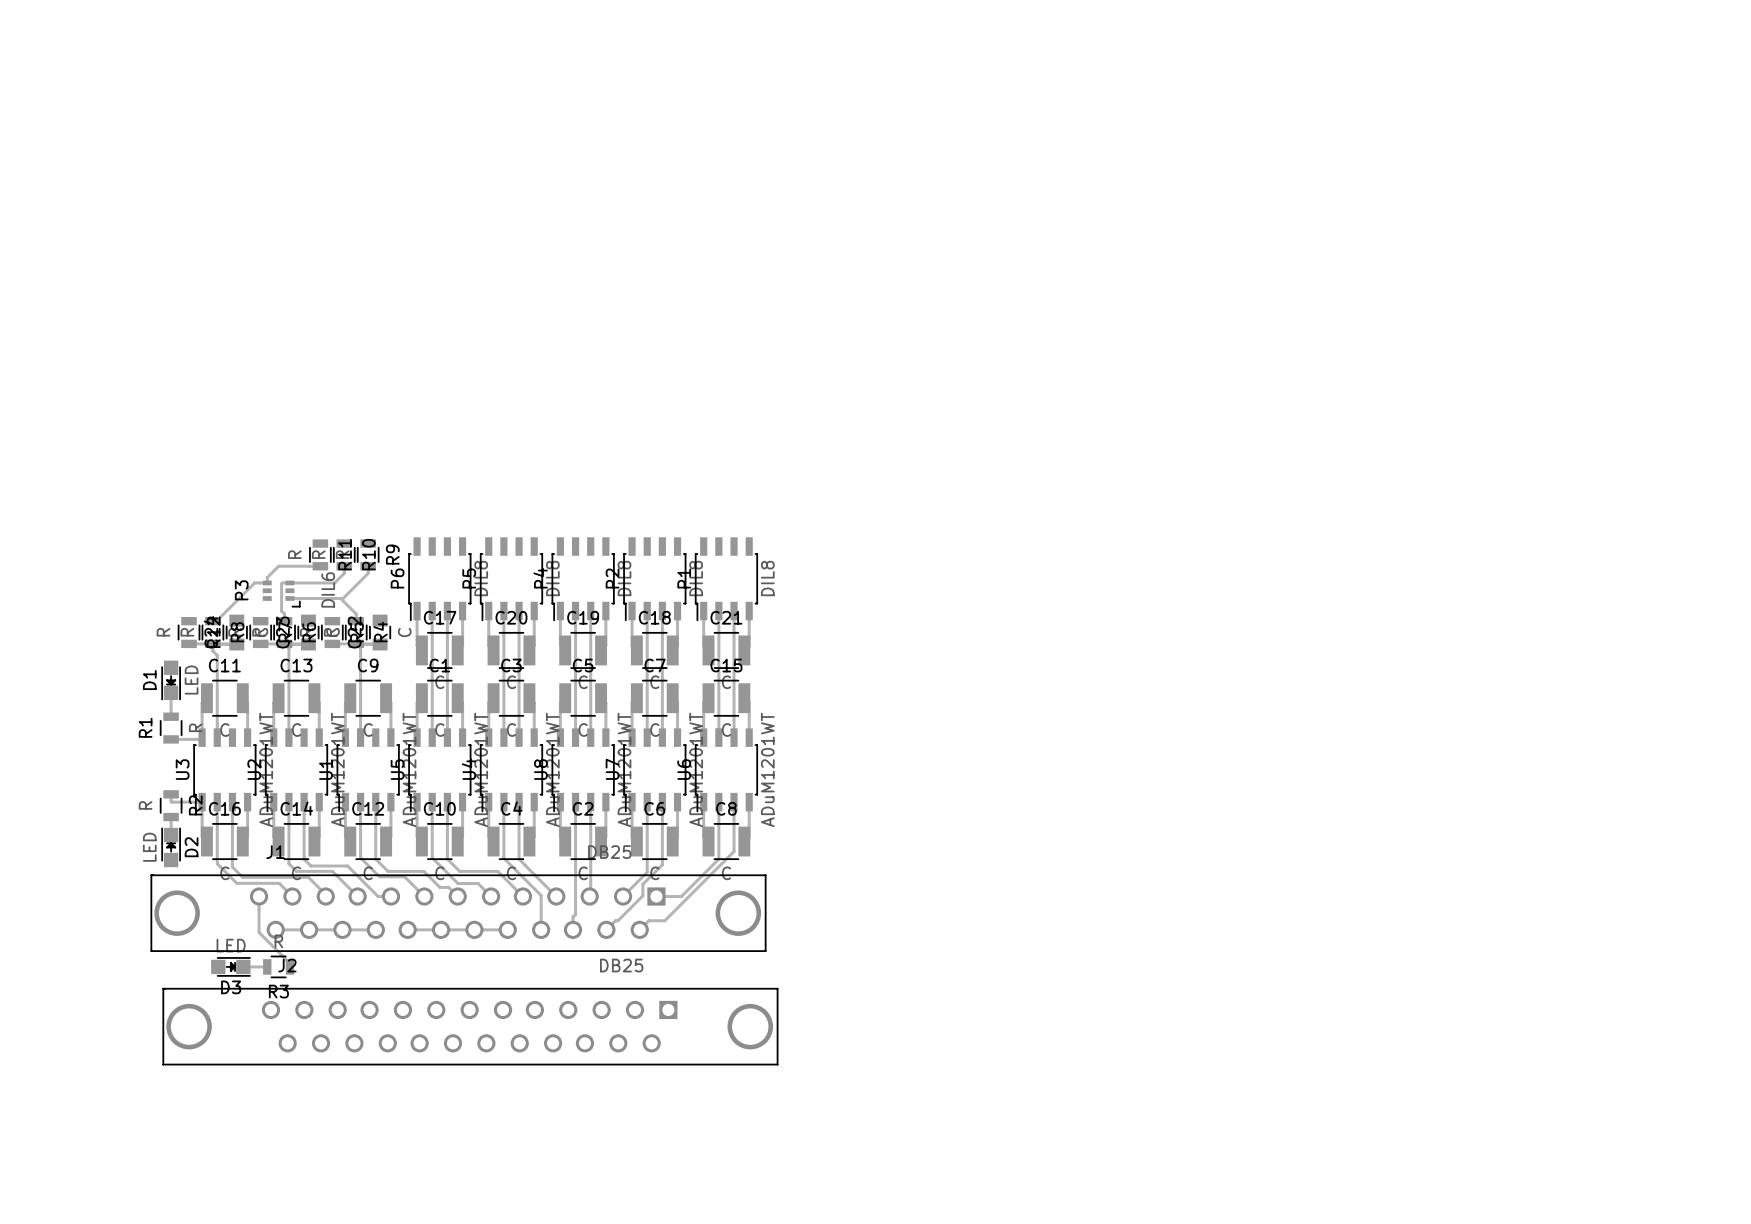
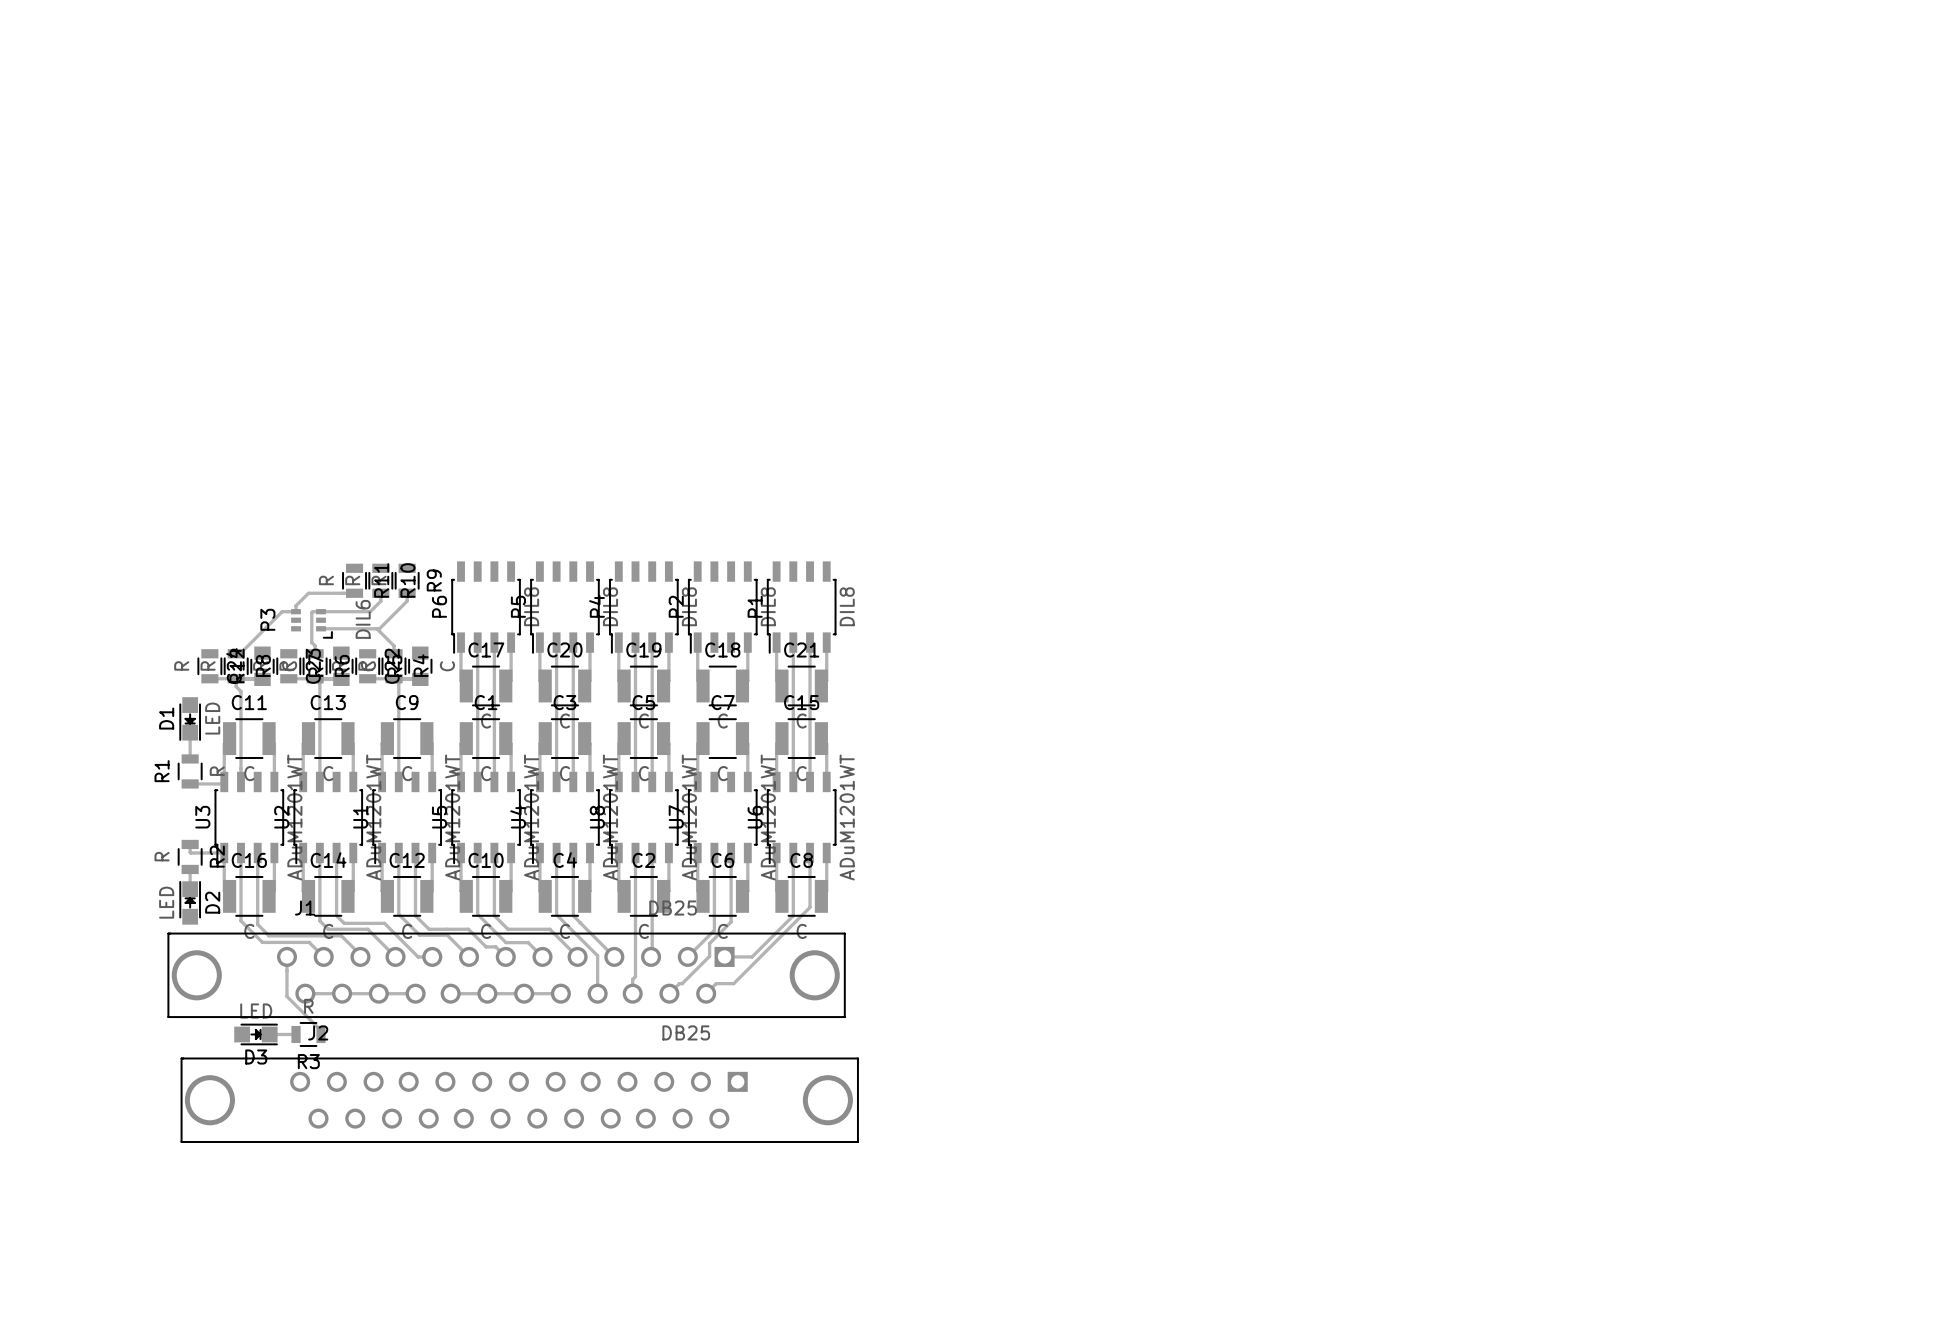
track: (647, 611) (647, 737) -> none
track: (662, 611) (662, 737) -> none

